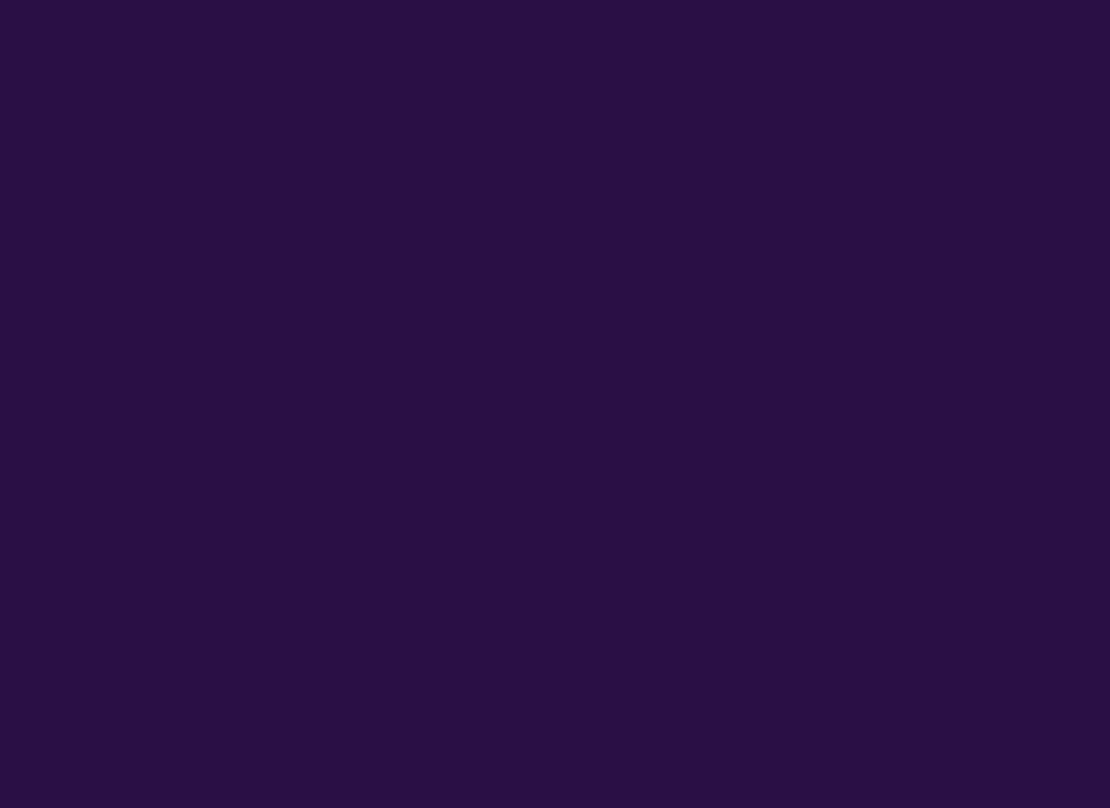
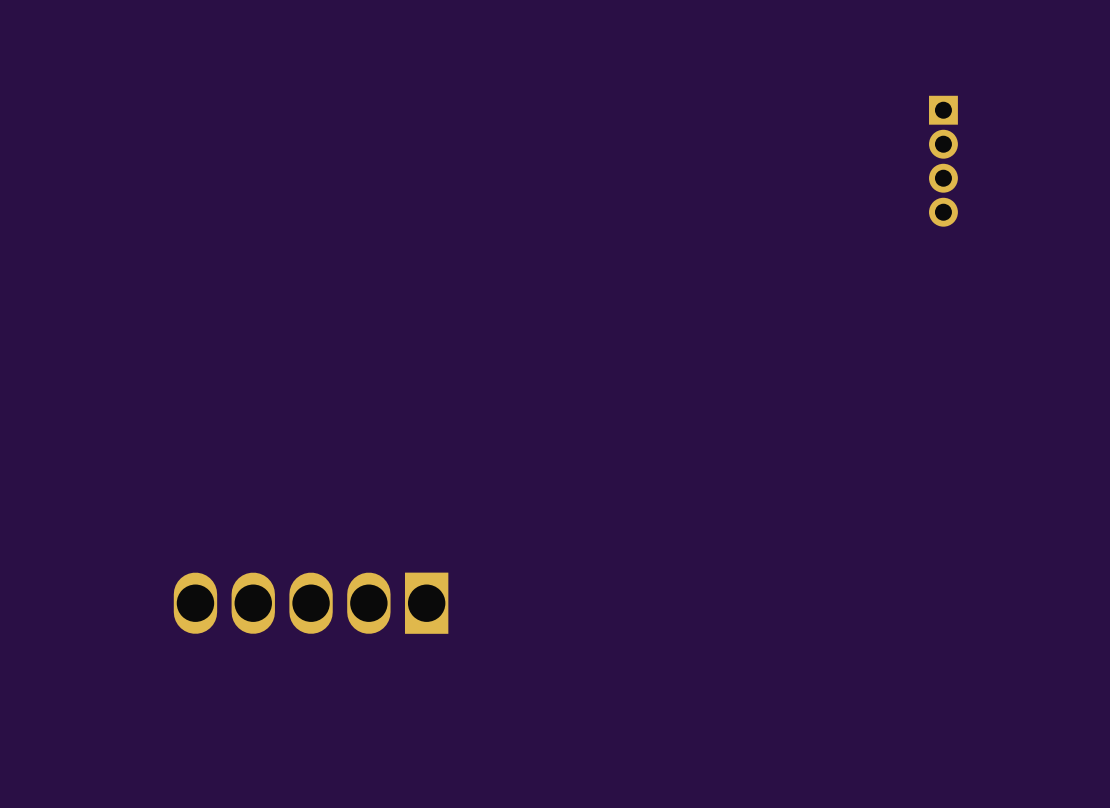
part: none -> (943, 161)
part: none -> (311, 603)

